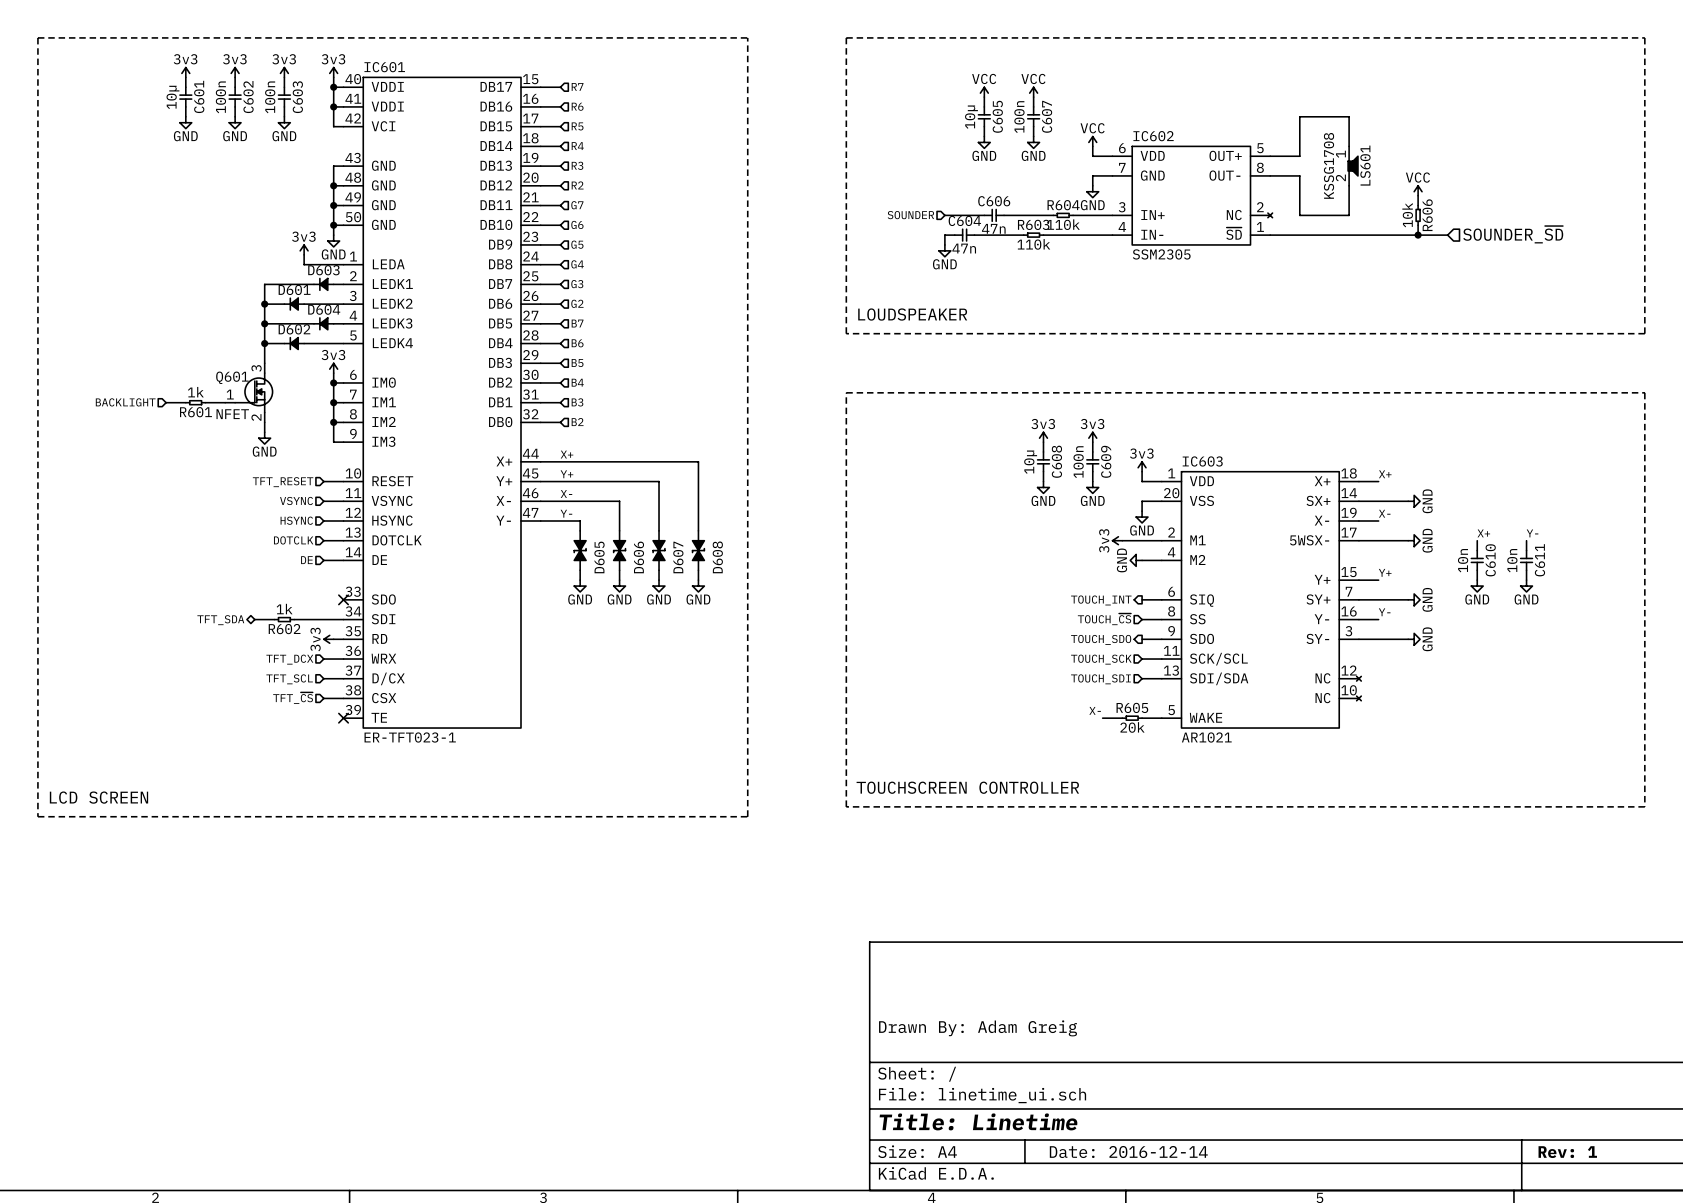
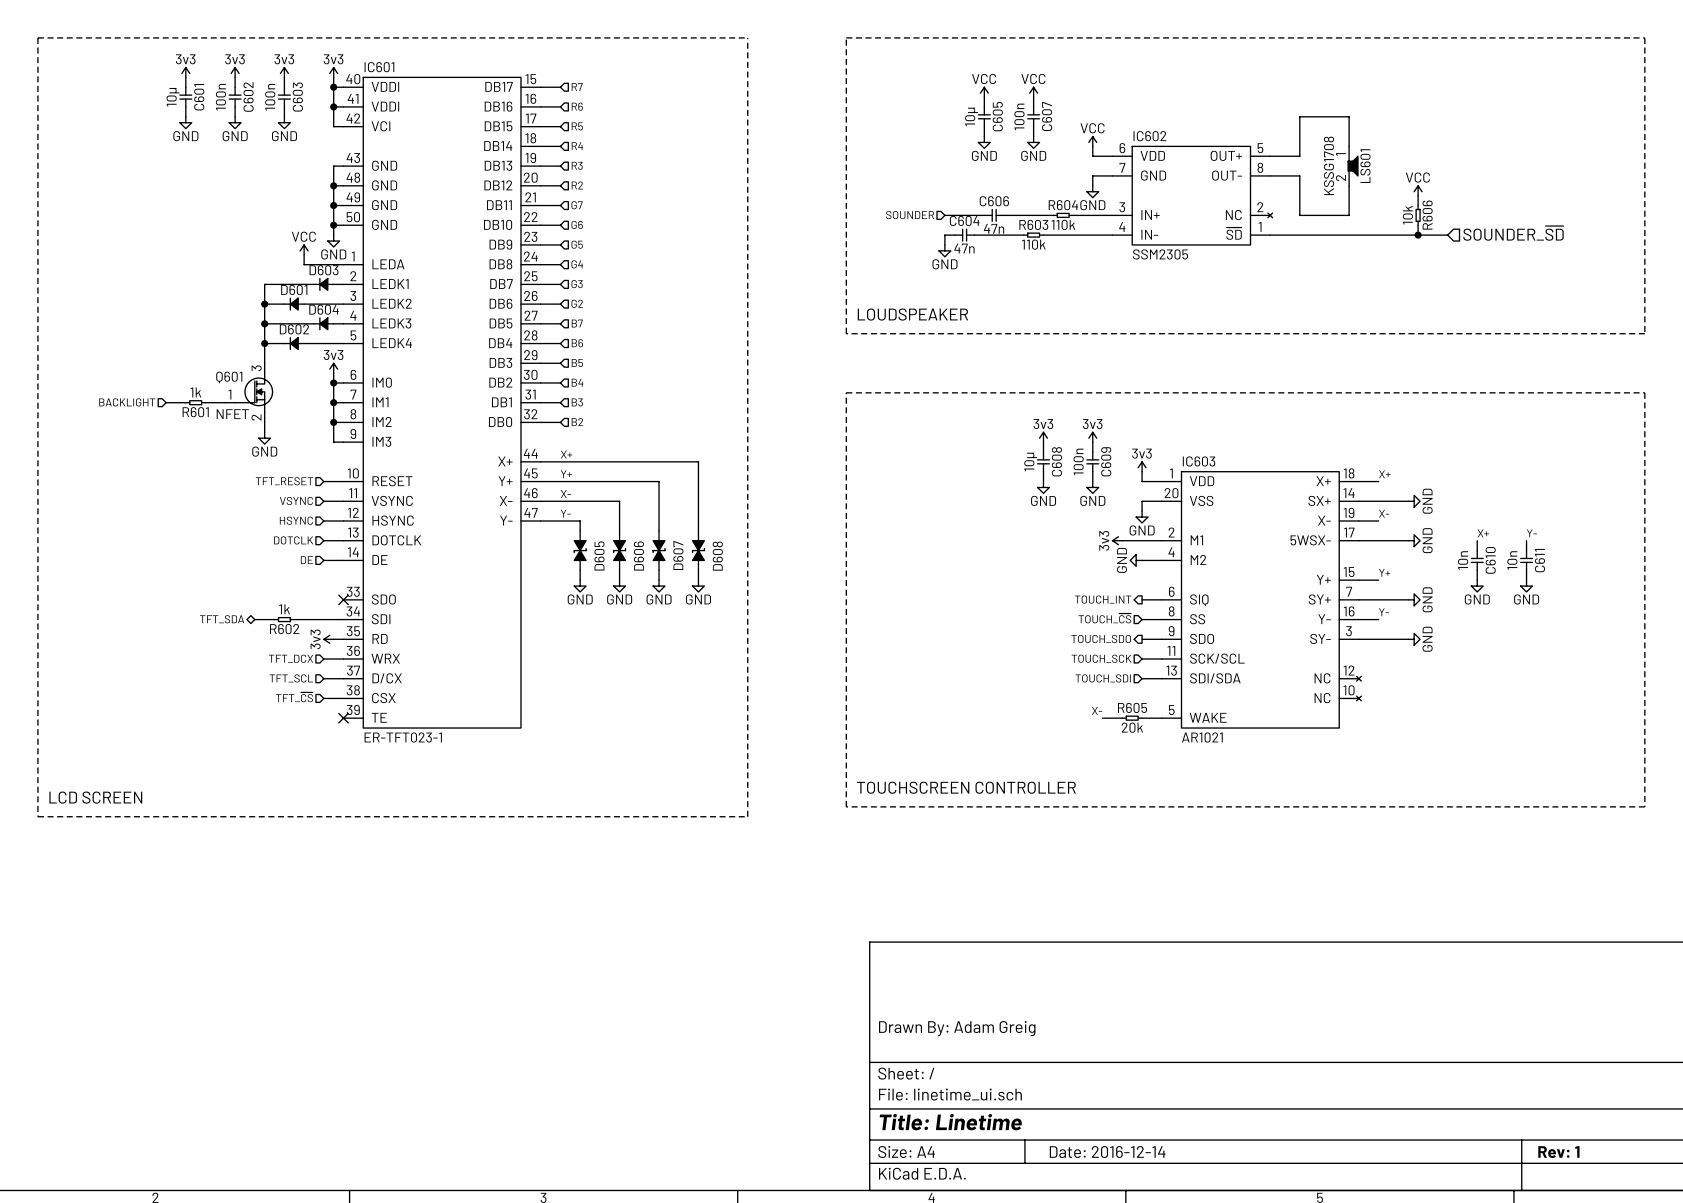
power symbol: 3v3 (304, 249) -> VCC (304, 249)

